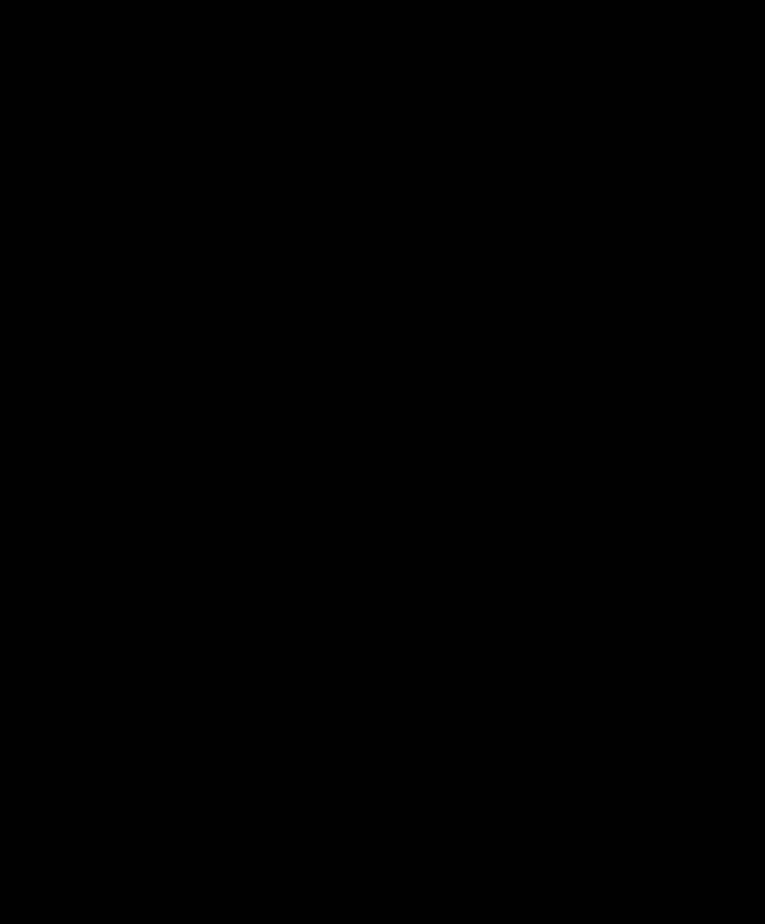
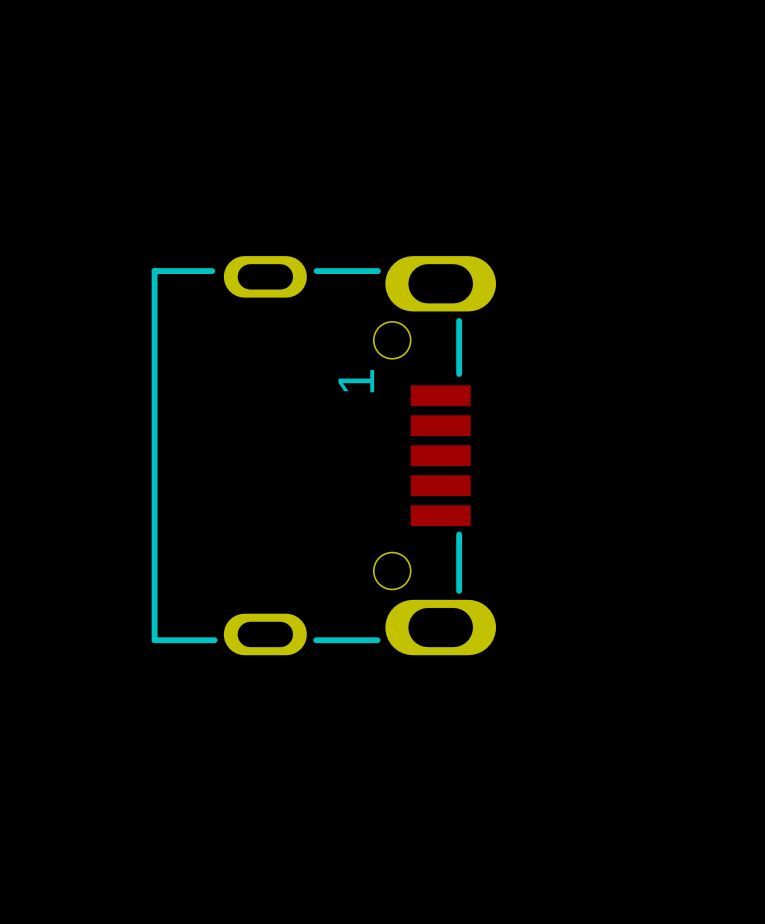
part: none -> (323, 455)

